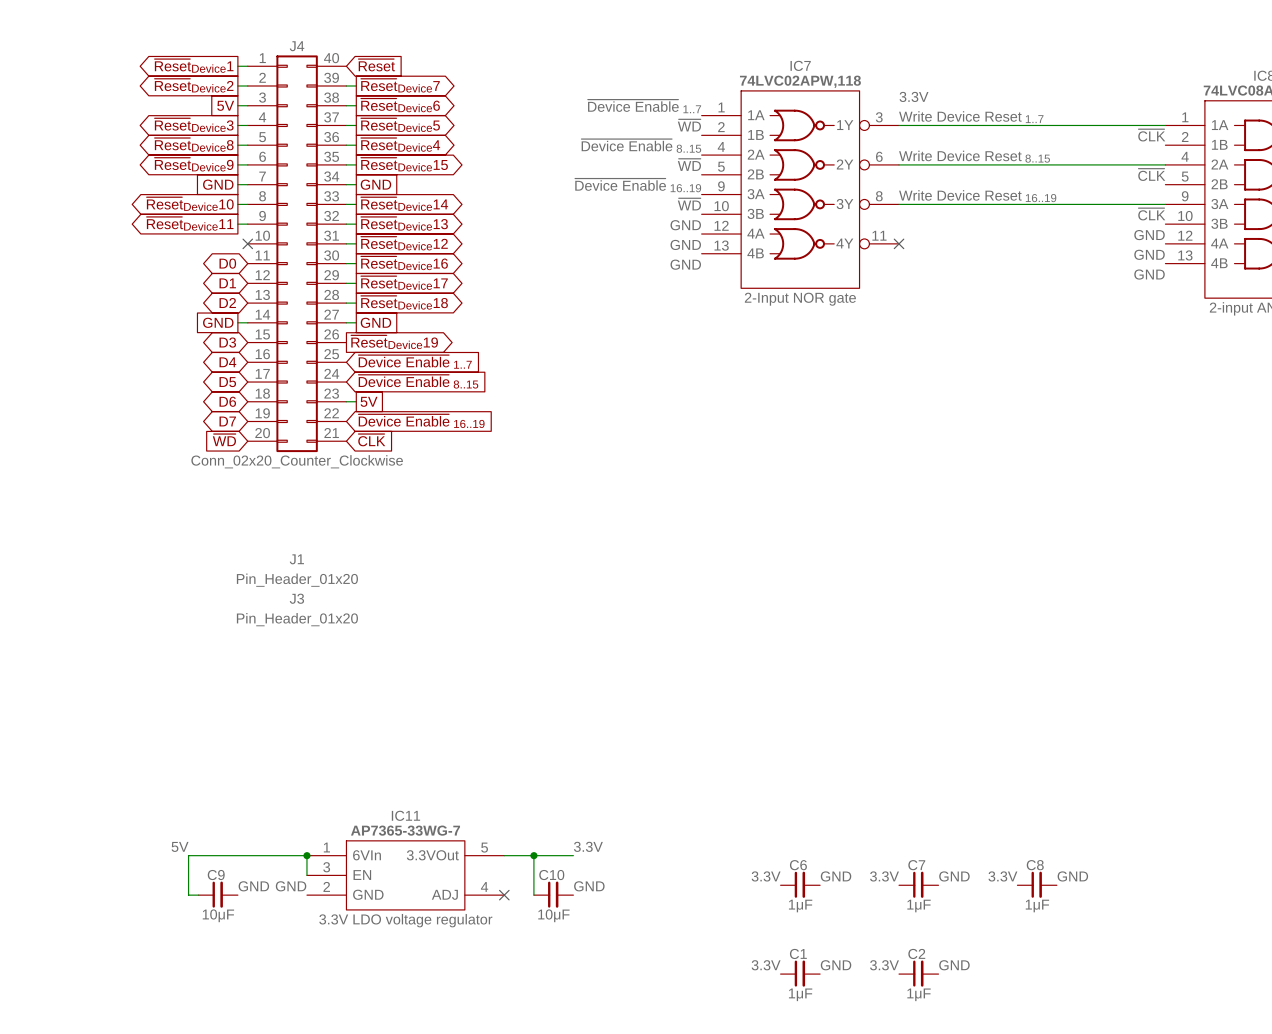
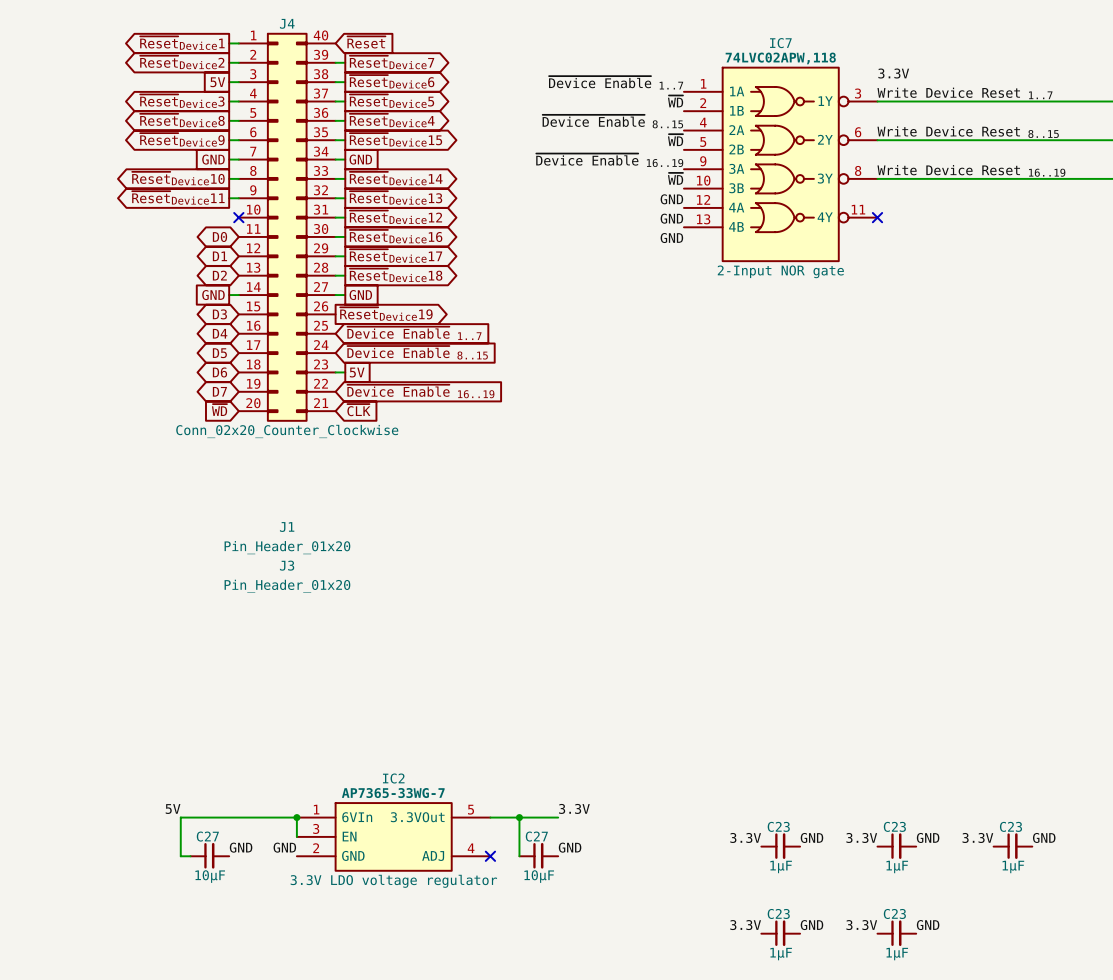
IC11 name: IC11 (405, 815) -> IC2 (393, 778)
C6 name: C6 (798, 865) -> C23 (778, 826)
C7 name: C7 (916, 865) -> C23 (894, 826)
C8 name: C8 (1035, 865) -> C23 (1010, 826)
C9 name: C9 (216, 875) -> C27 (207, 836)
C10 name: C10 (551, 875) -> C27 (536, 836)
C1 name: C1 (798, 953) -> C23 (778, 913)
C2 name: C2 (916, 953) -> C23 (894, 913)

